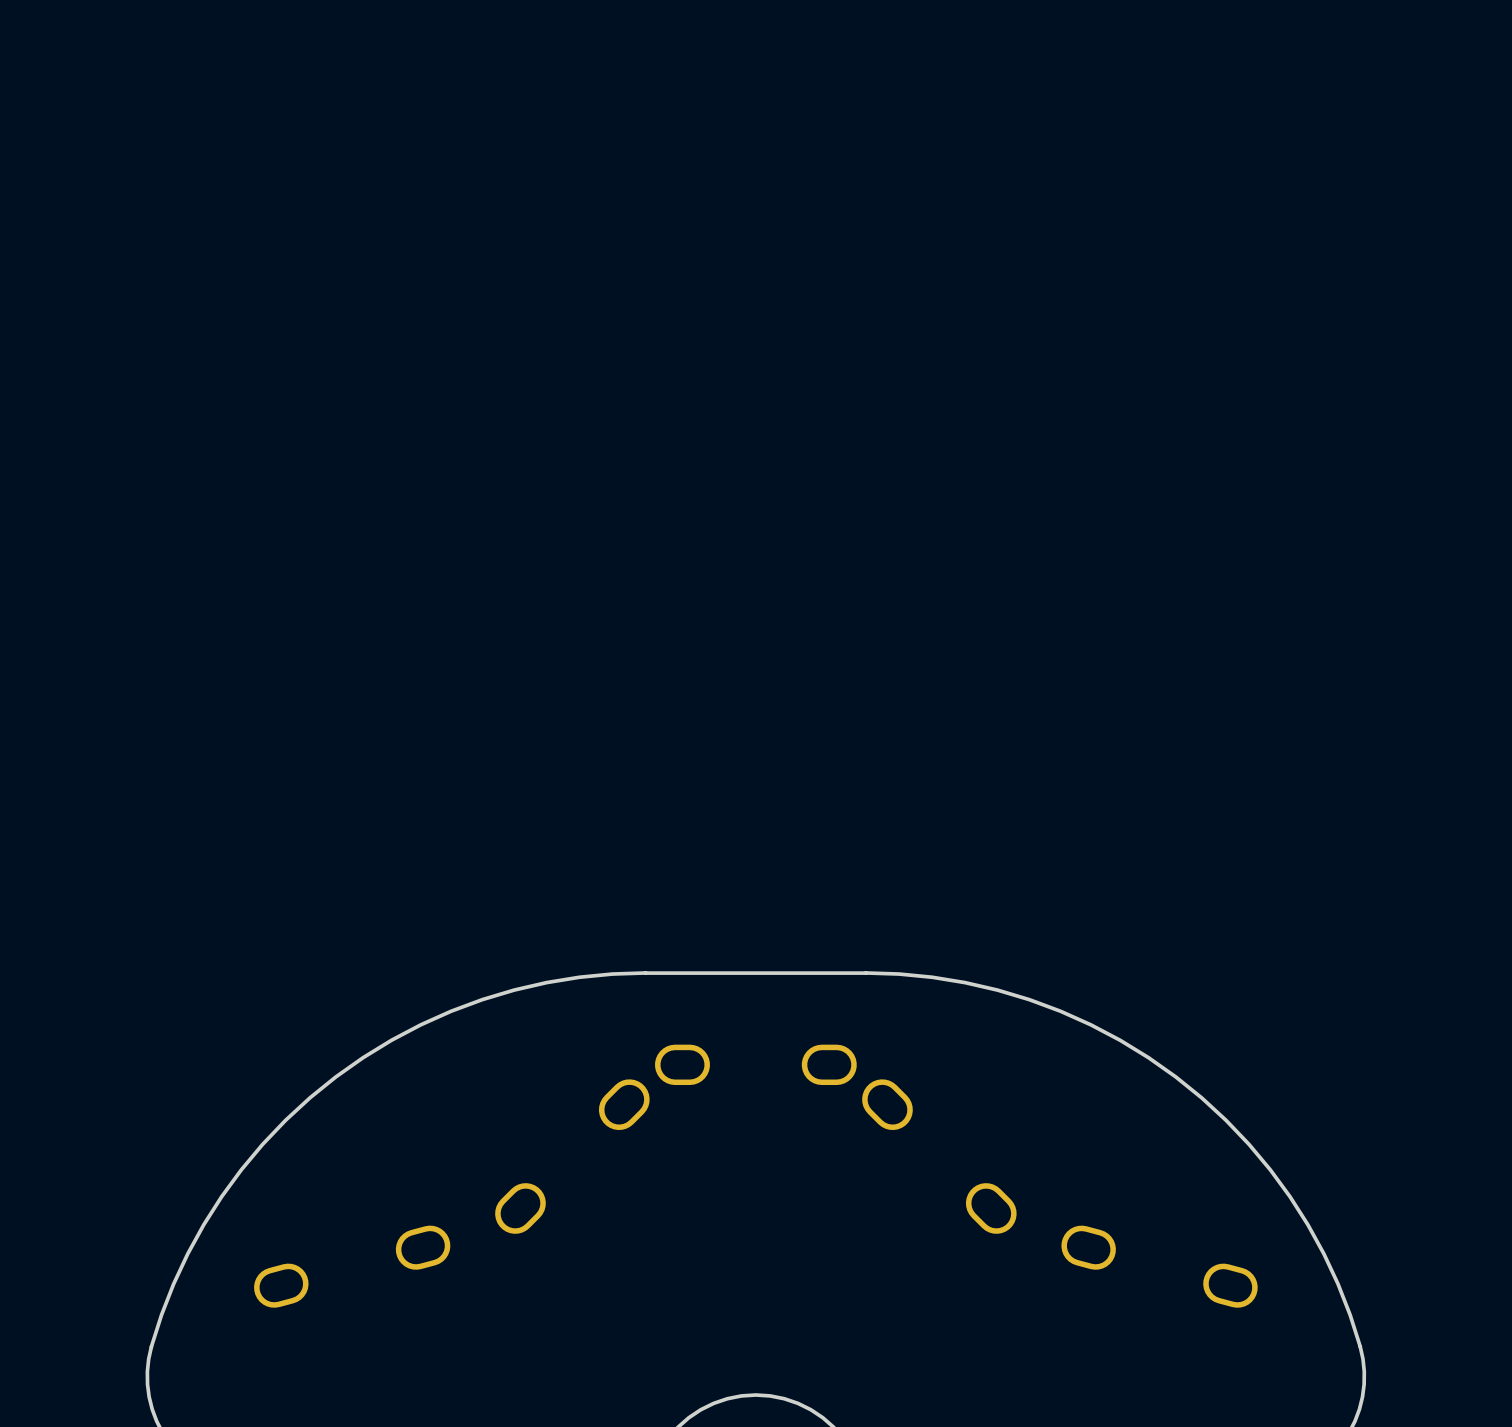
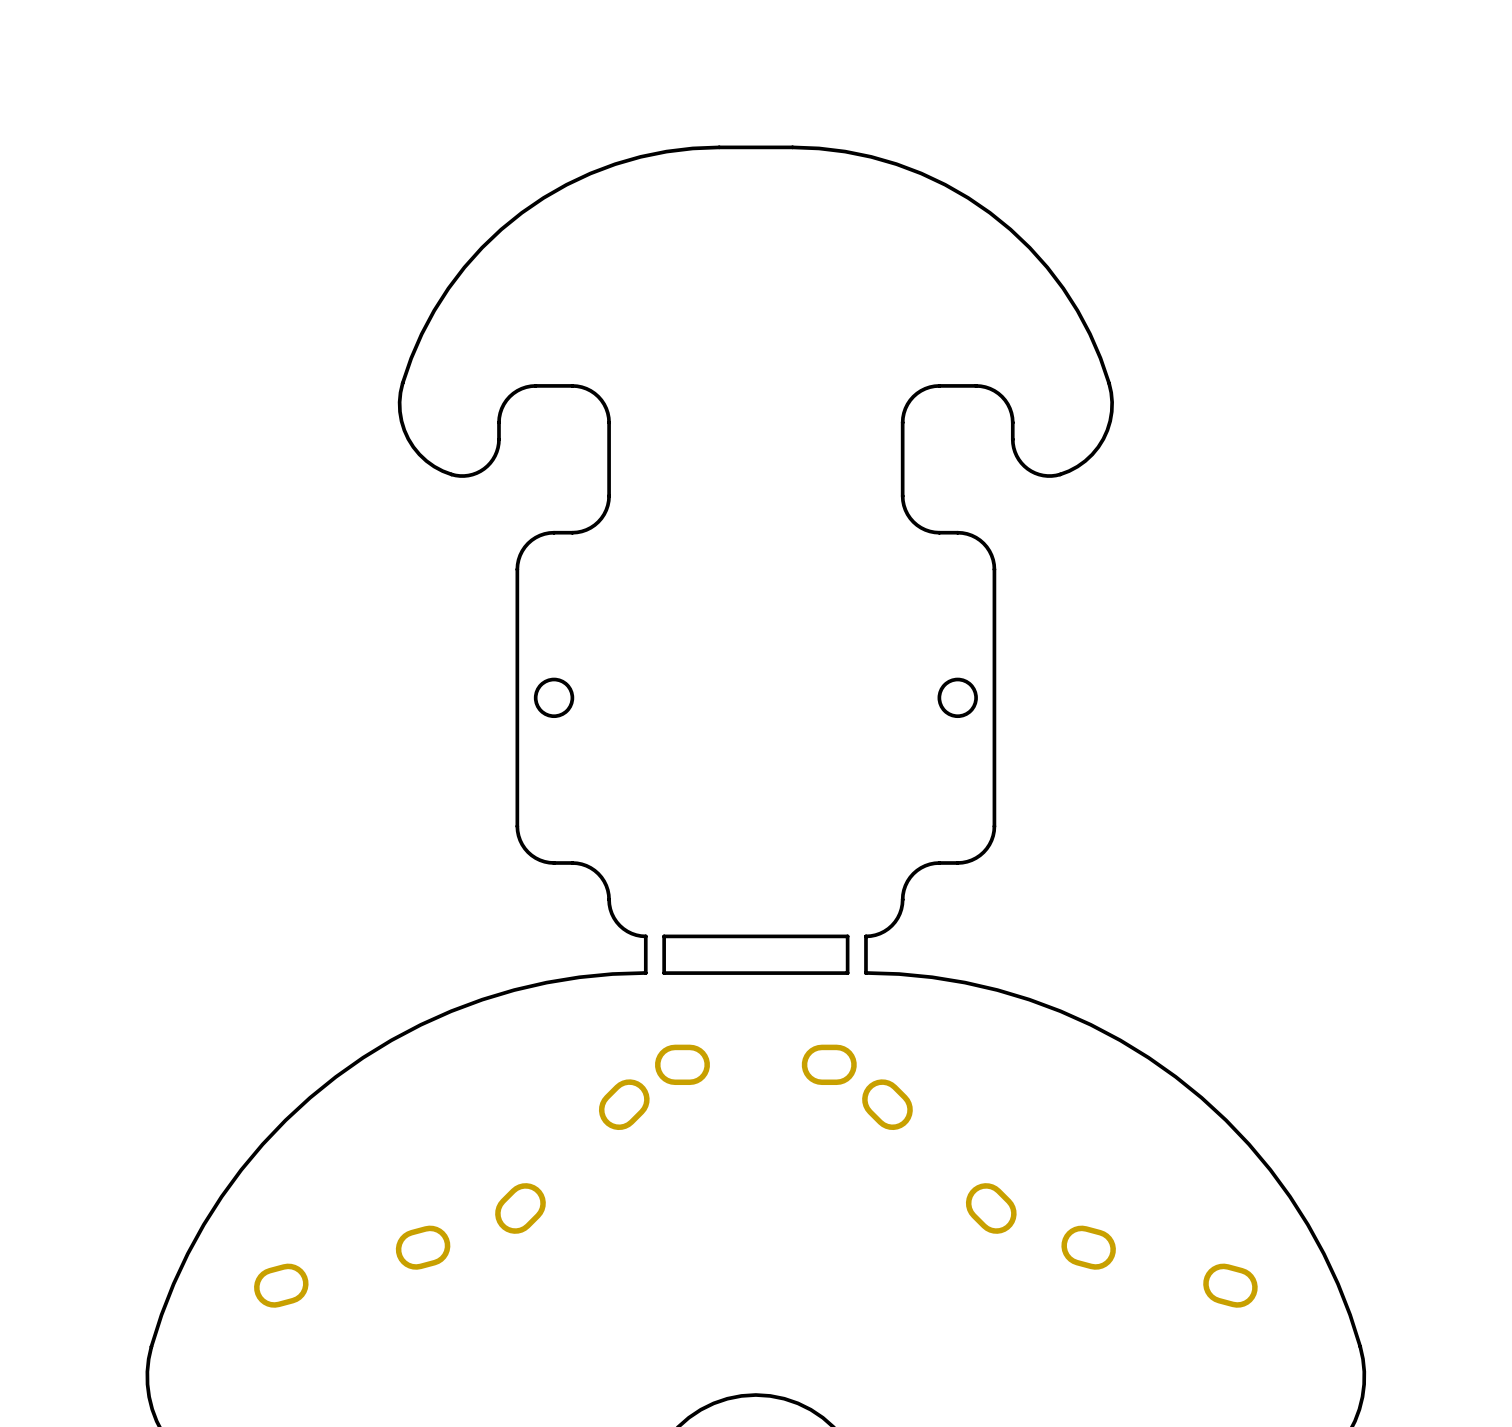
round board edge: none -> [533, 677, 575, 719]
round board edge: none -> [937, 677, 978, 719]
board edge: (664, 973) (645, 973) -> (664, 973) (664, 936) (847, 936) (847, 973)
board edge: (865, 973) (847, 973) -> (865, 973) (865, 936) (880, 933) (895, 922) (901, 909) (905, 885) (913, 873) (929, 864) (962, 862) (976, 858) (986, 848) (994, 831) (993, 559) (986, 547) (976, 537) (962, 533) (934, 532) (925, 529) (913, 521) (907, 514) (902, 496) (902, 422) (905, 408) (913, 396) (929, 387) (976, 385) (990, 388) (1002, 396) (1009, 408) (1012, 417) (1013, 443) (1018, 459) (1031, 471) (1051, 476) (1077, 466) (1098, 447) (1107, 430) (1112, 402) (1109, 383) (1100, 358) (1077, 310) (1063, 288) (1029, 247) (989, 212) (945, 184) (896, 164) (845, 151) (792, 147) (692, 148) (640, 156) (590, 173) (543, 197) (521, 212) (482, 247) (448, 288) (421, 334) (411, 358) (400, 392) (401, 421) (413, 447) (434, 466) (459, 476) (480, 471) (492, 459) (498, 443) (499, 417) (501, 408) (509, 396) (521, 388) (535, 385) (581, 387) (598, 396) (606, 408) (609, 422) (609, 496) (604, 514) (598, 521) (586, 529) (577, 532) (549, 533) (535, 537) (524, 547) (518, 559) (517, 831) (524, 848) (535, 858) (549, 862) (581, 864) (598, 873) (606, 885) (610, 909) (616, 922) (631, 933) (645, 936) (645, 973)

